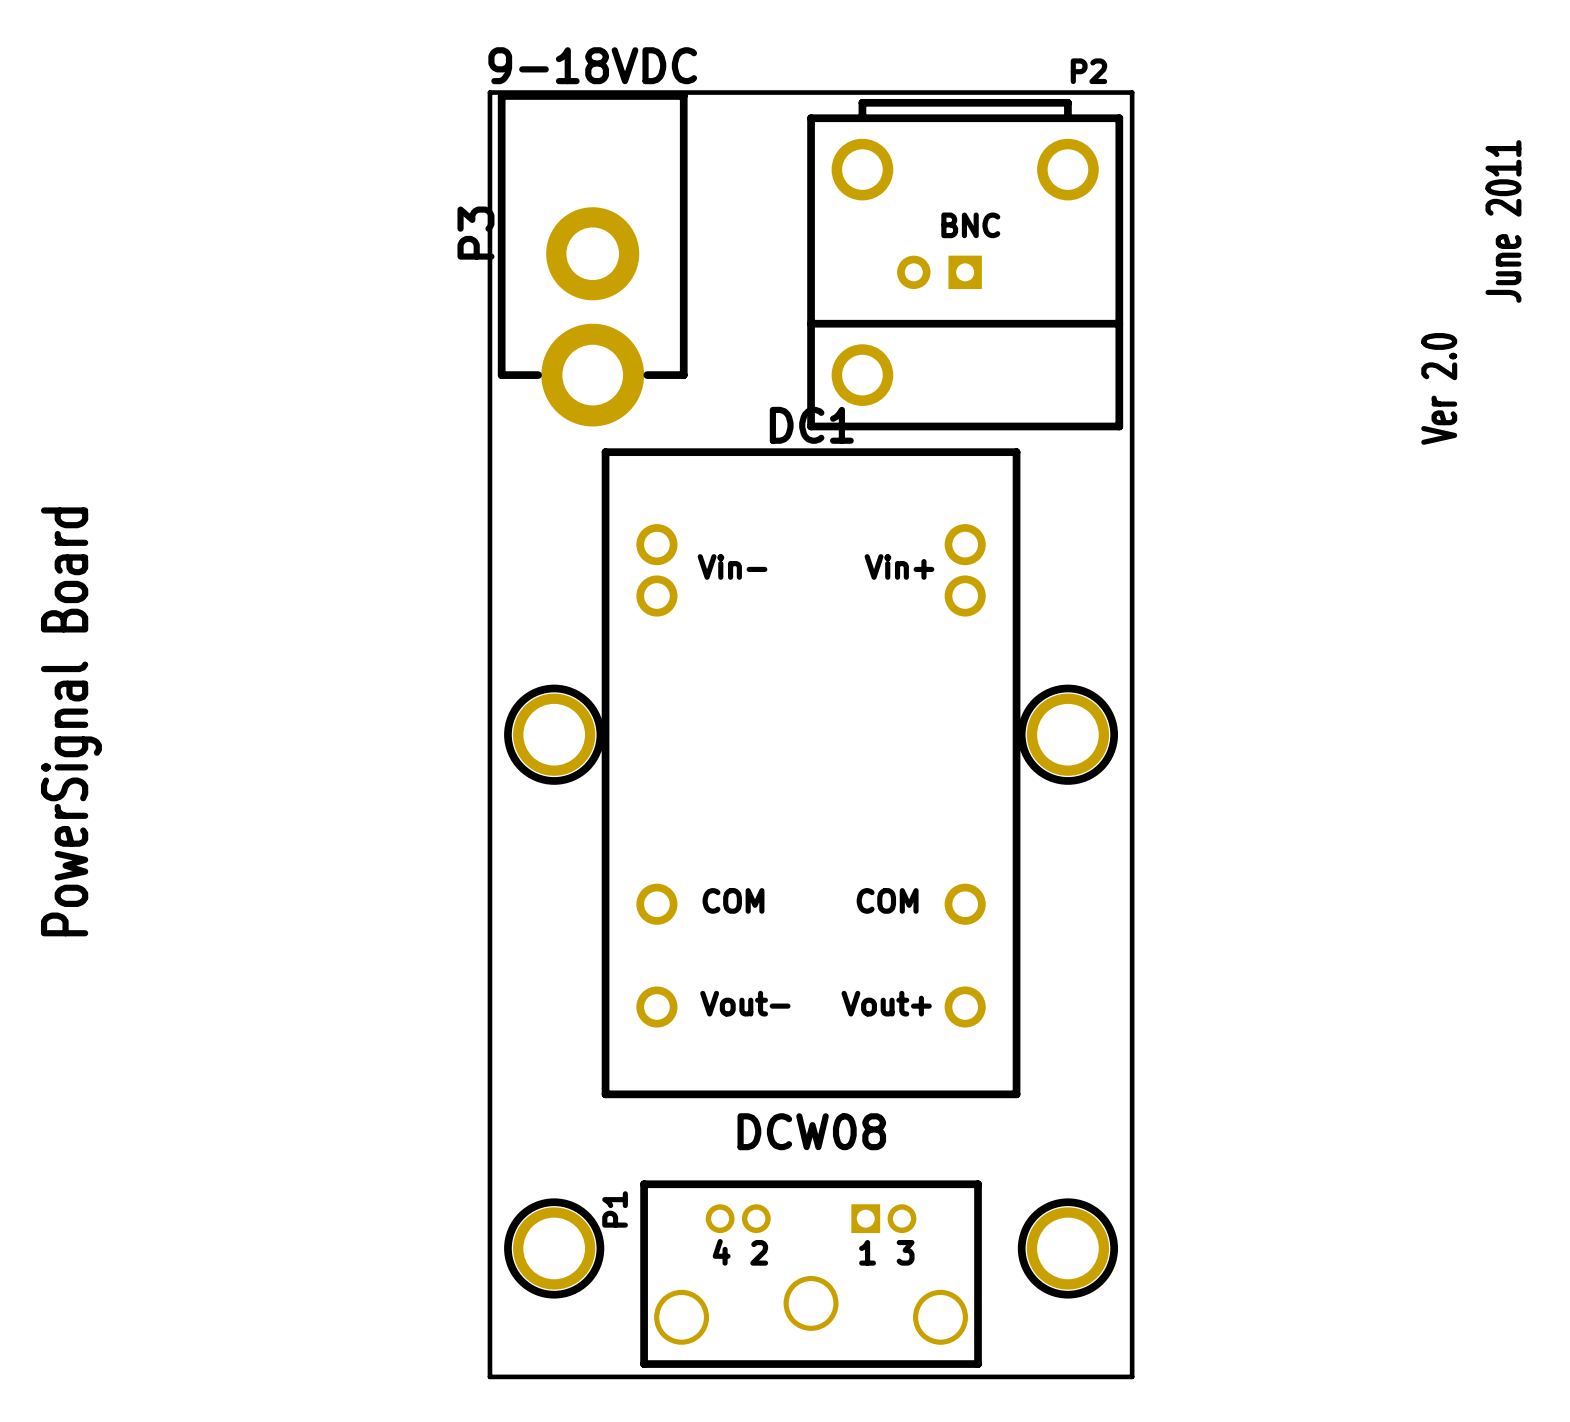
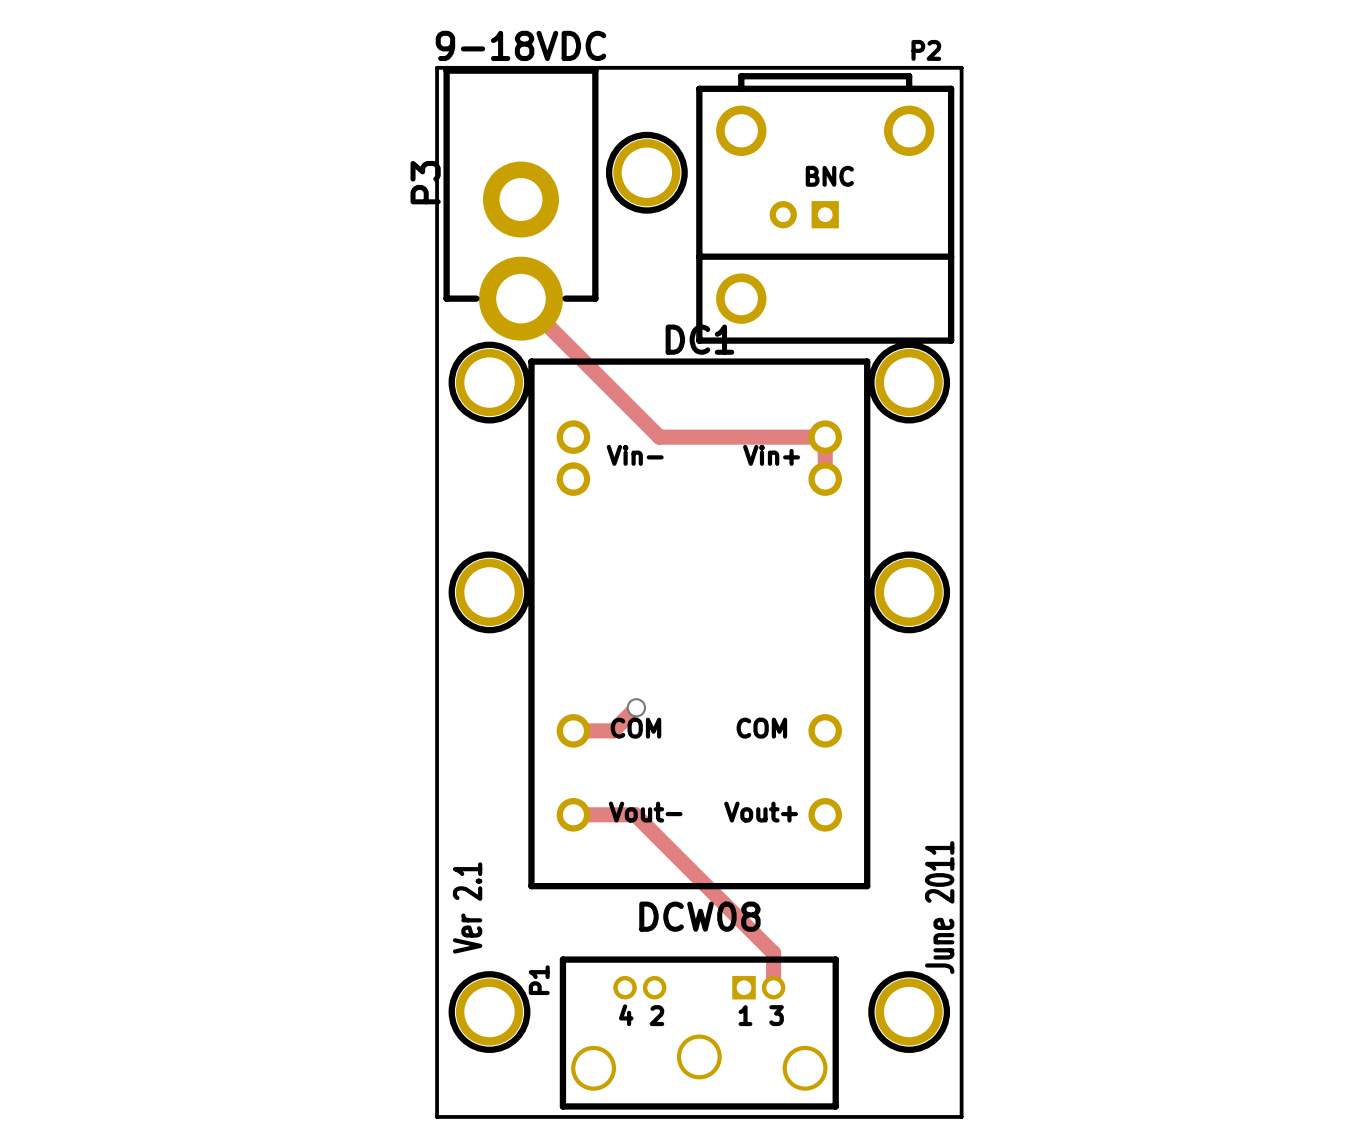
part: none -> (646, 172)
text: June 2011 (1503, 221) -> none
track: none -> (520, 298) (659, 437) (825, 437) (825, 479)
text: Ver 2.0 (1439, 388) -> none
part: none -> (489, 382)
part: none -> (909, 382)
text: PowerSignal Board (71, 721) -> none
track: none -> (636, 707) (613, 730) (573, 730)
via: none -> (636, 707)
track: none -> (573, 814) (635, 814) (773, 953) (773, 987)
text: none -> June 2011 (939, 907)
text: none -> Ver 2.1 (467, 907)

